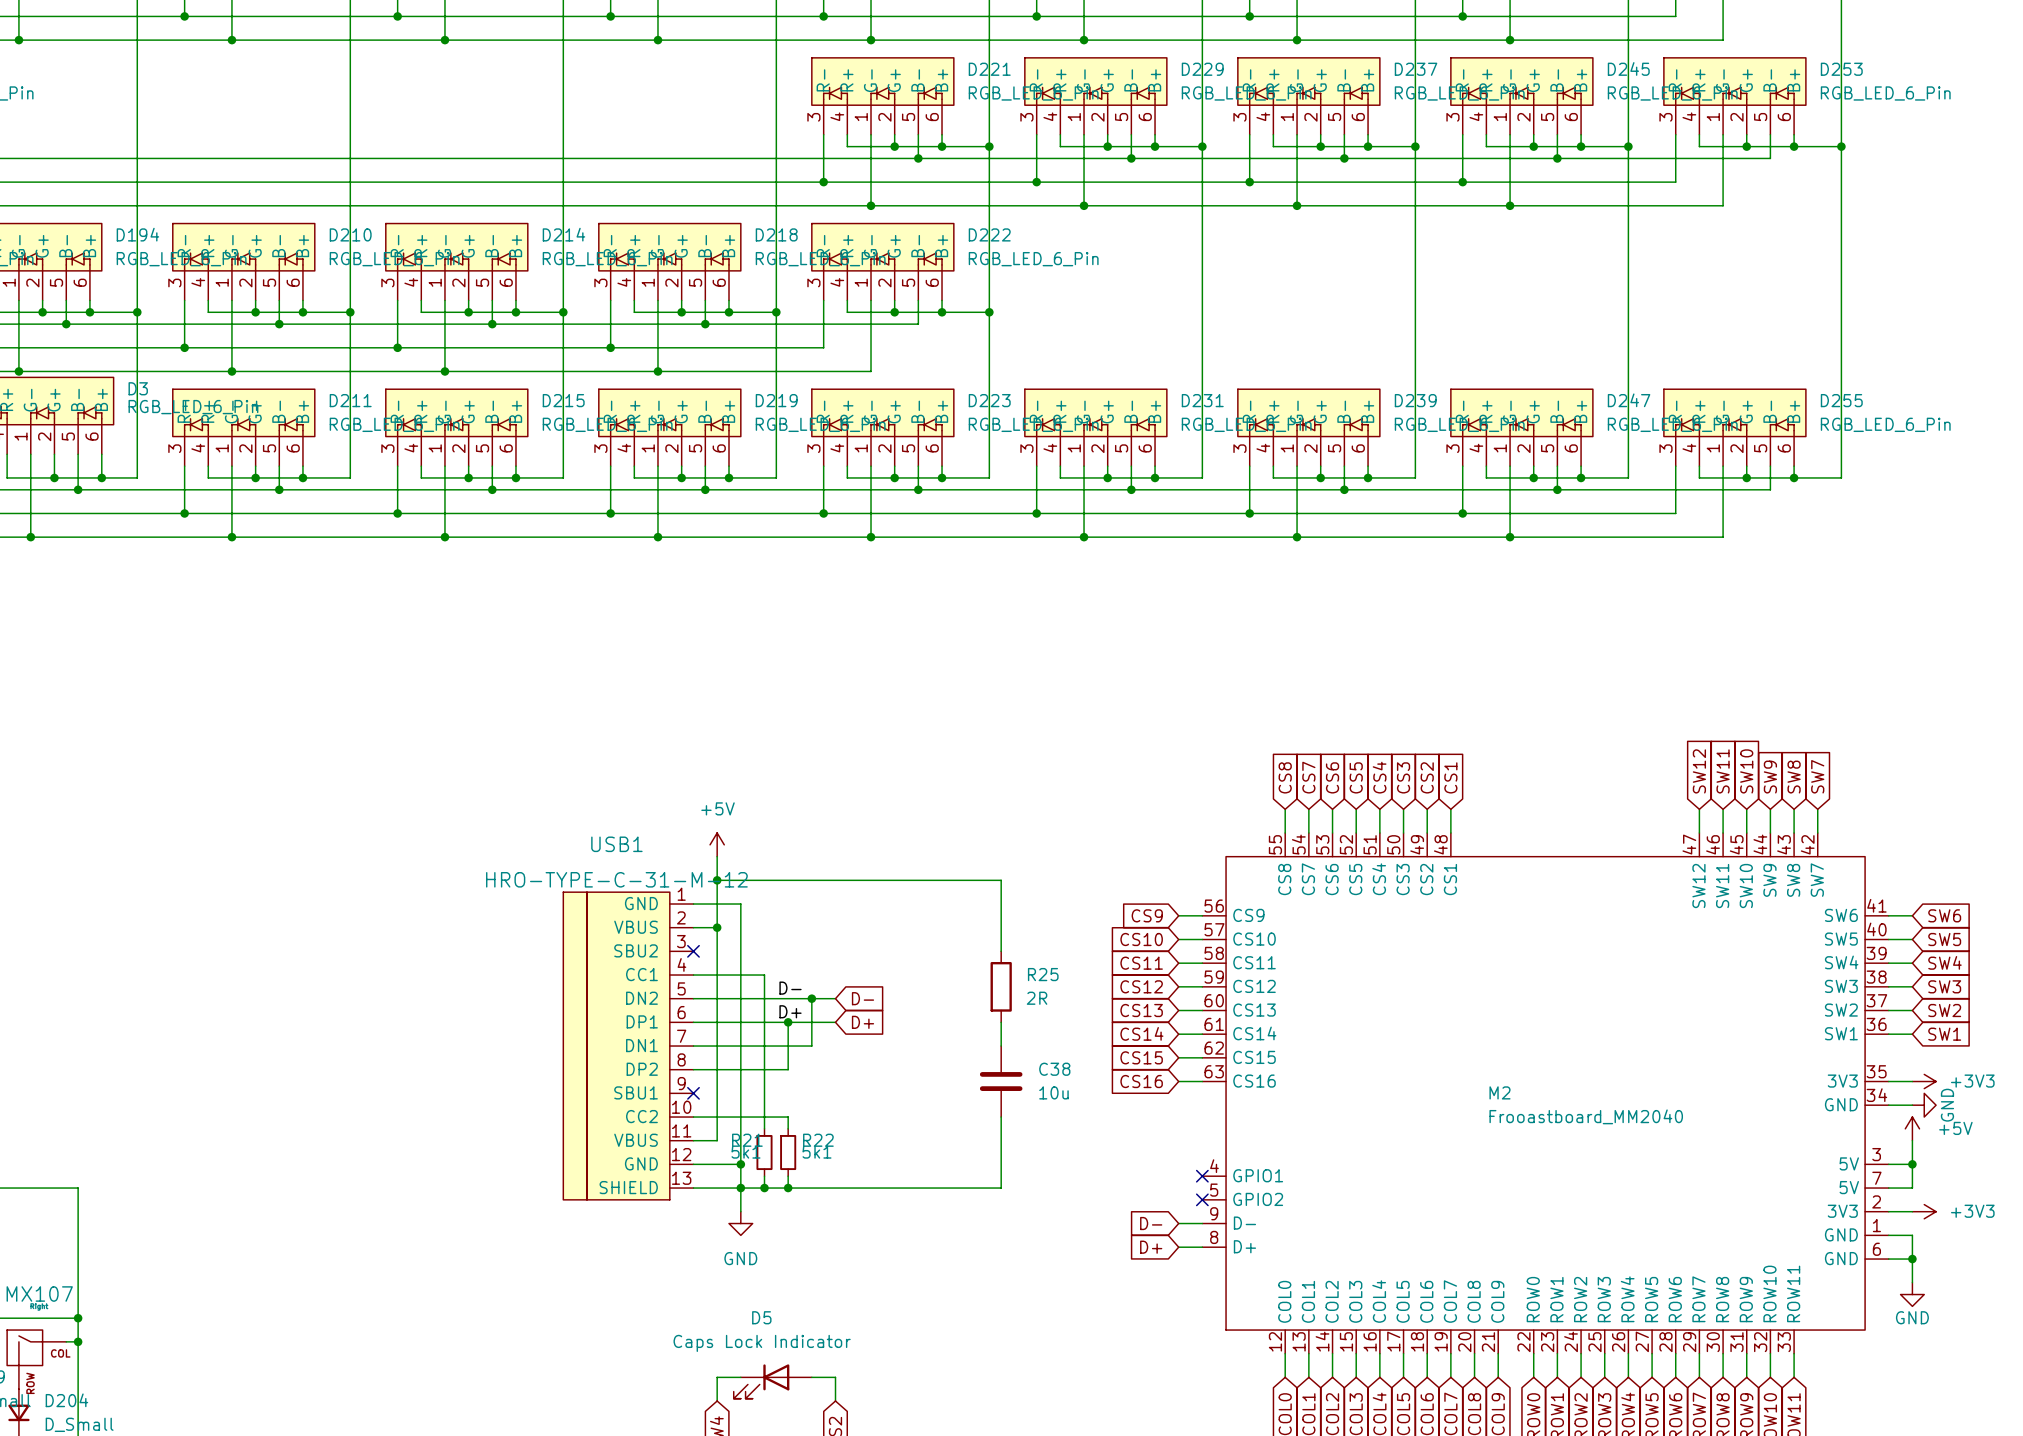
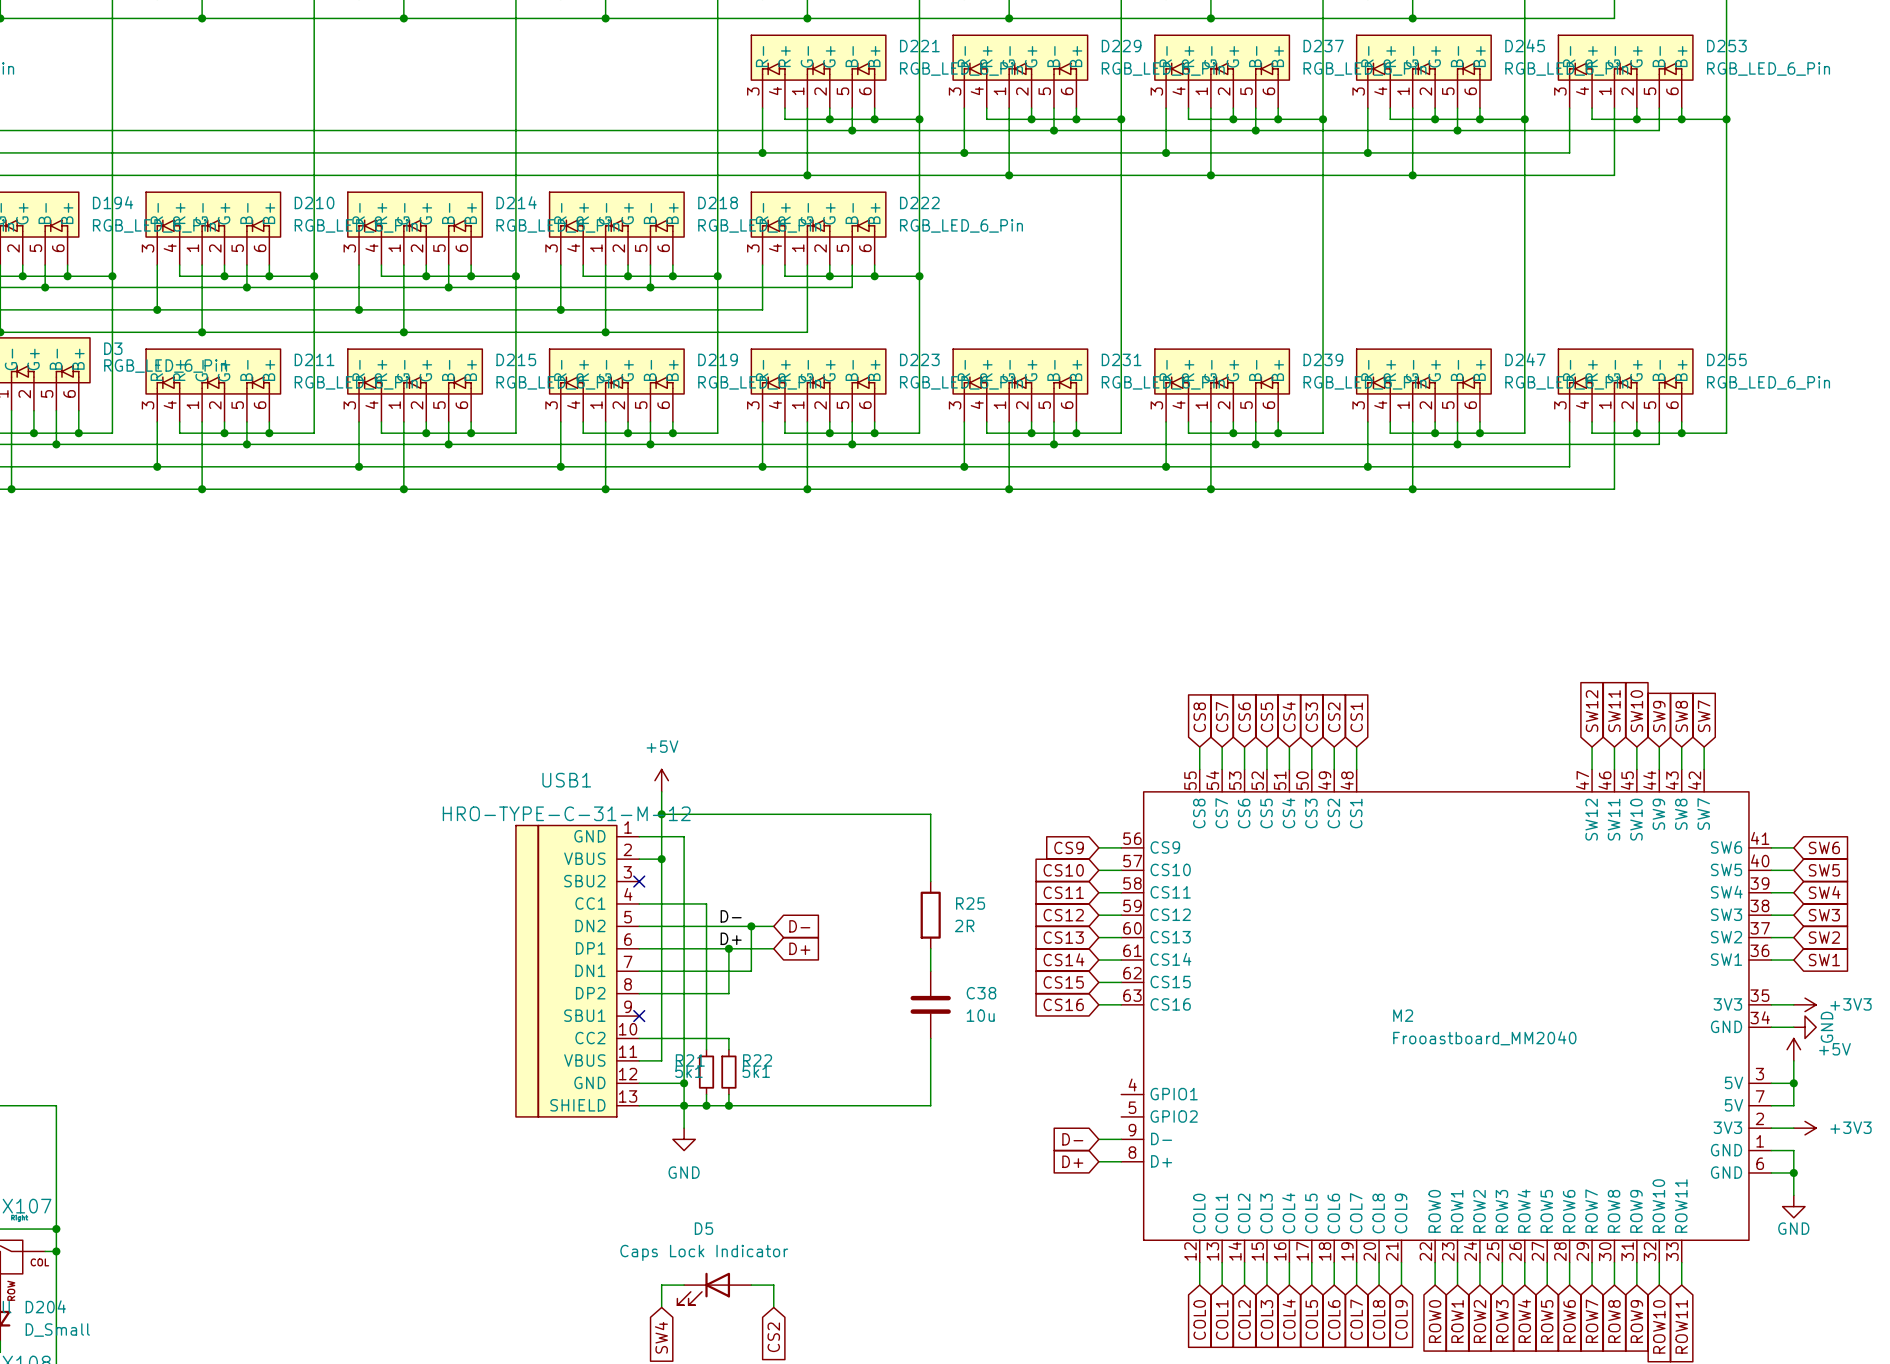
no-connect mark: (1202, 1176) -> none
no-connect mark: (1202, 1199) -> none

